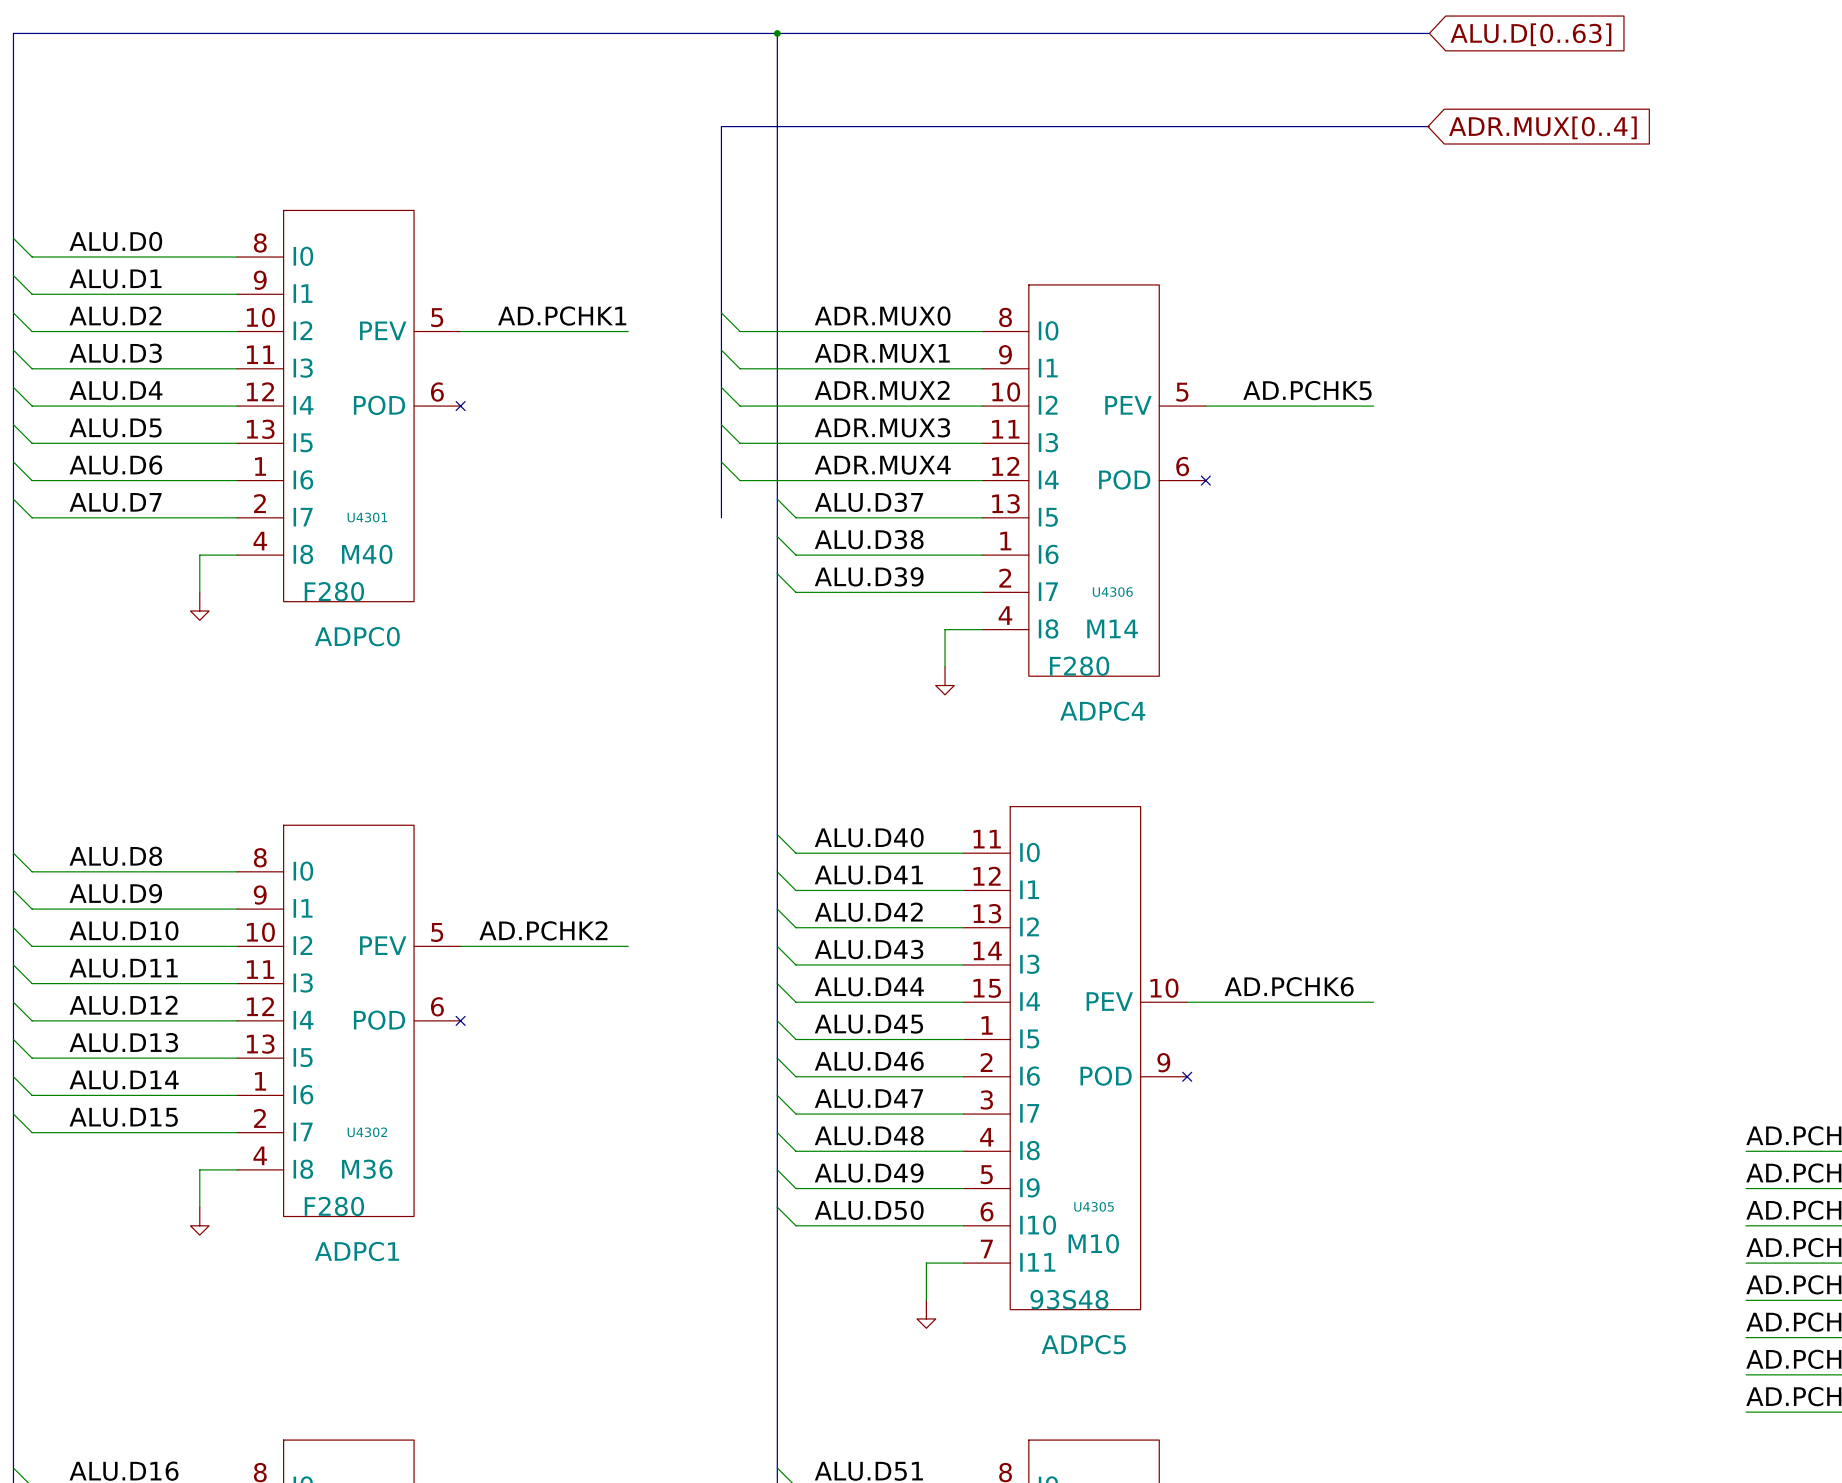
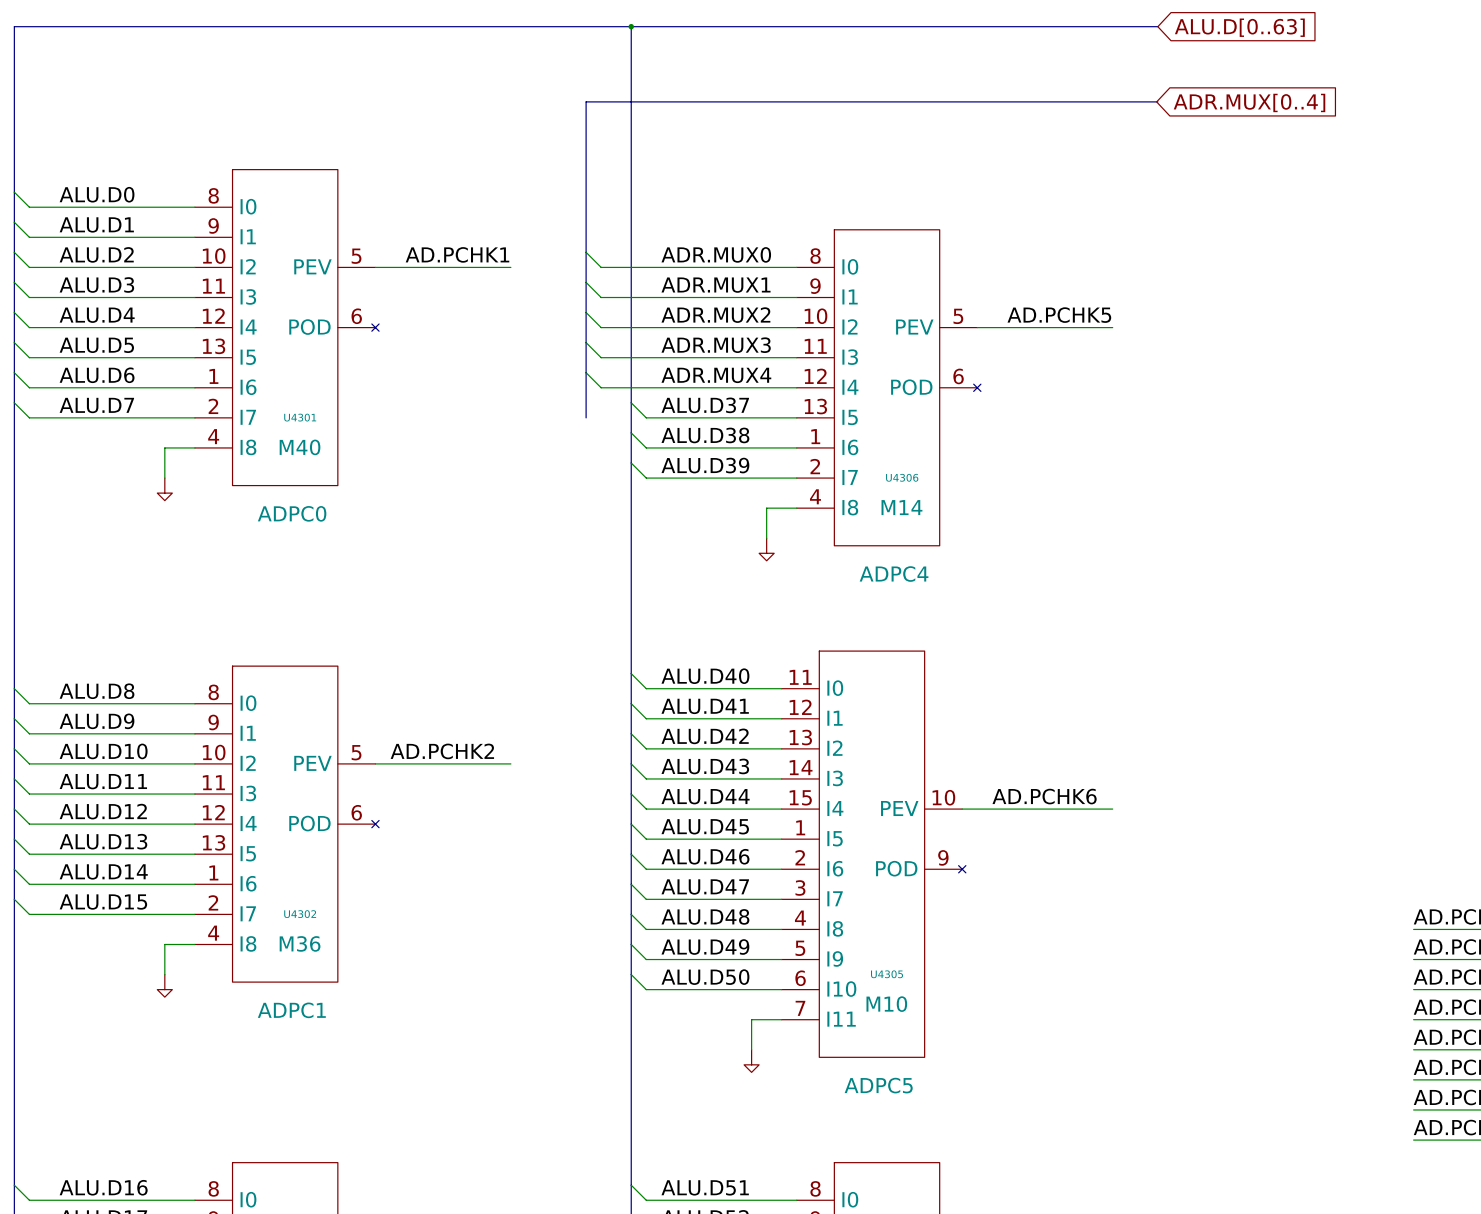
U4301 value: F280 (334, 591) -> none
U4306 value: F280 (1079, 666) -> none
U4302 value: F280 (334, 1206) -> none
U4305 value: 93S48 (1069, 1299) -> none

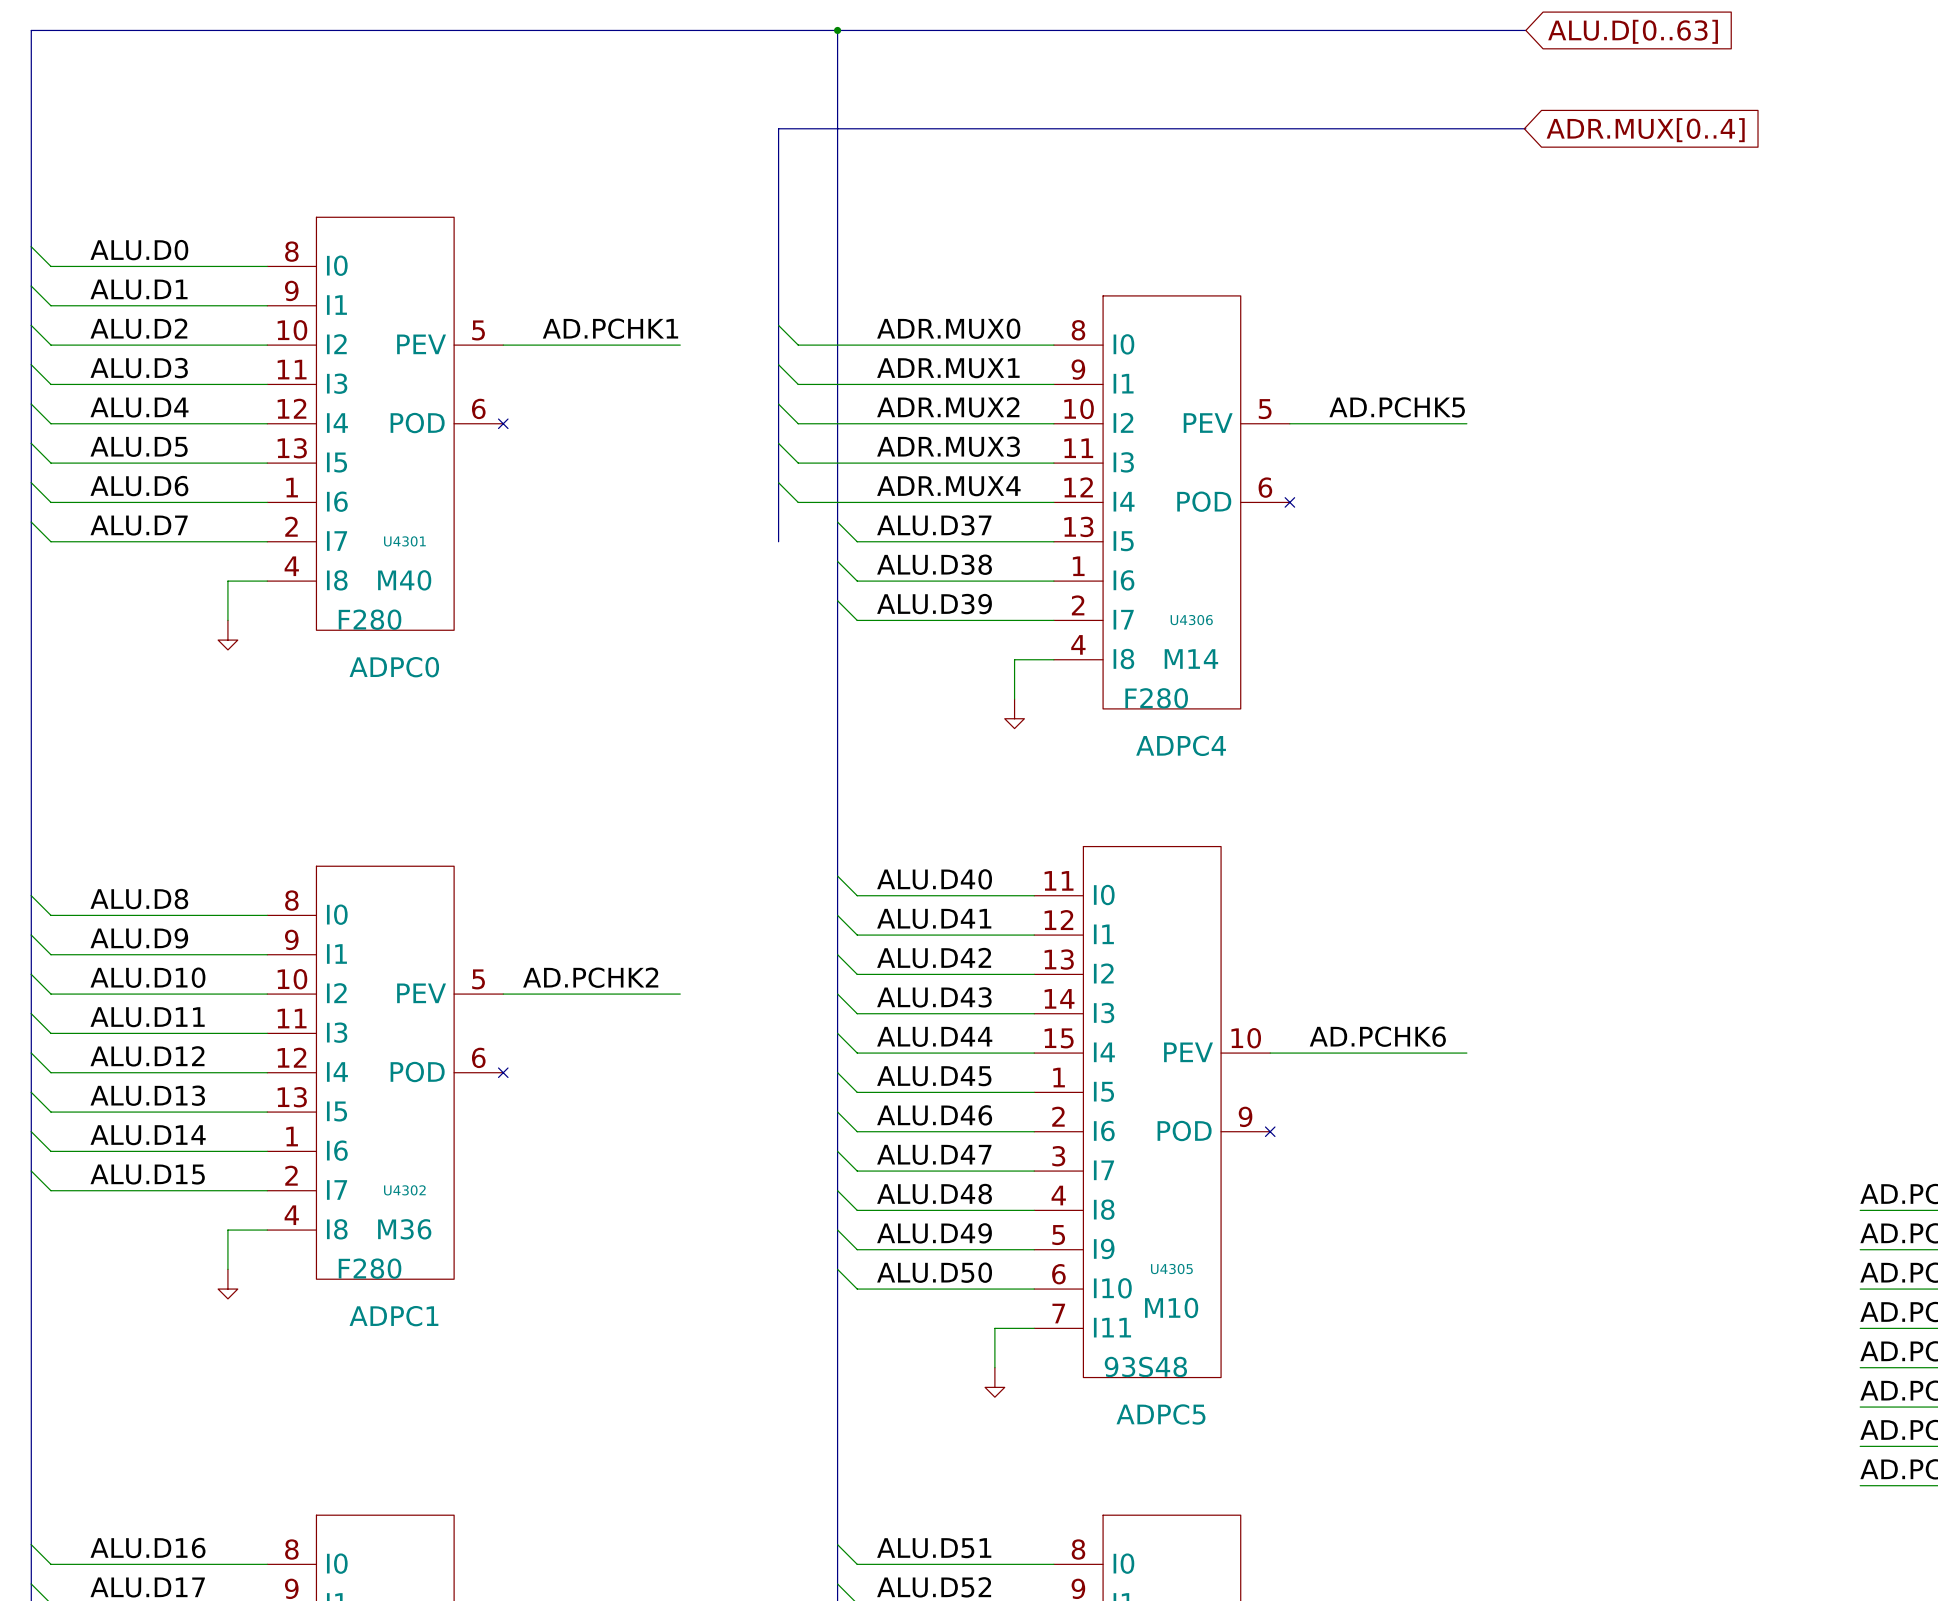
U4301 value: none -> F280 (370, 619)
U4306 value: none -> F280 (1156, 698)
U4302 value: none -> F280 (370, 1268)
U4305 value: none -> 93S48 (1145, 1366)

